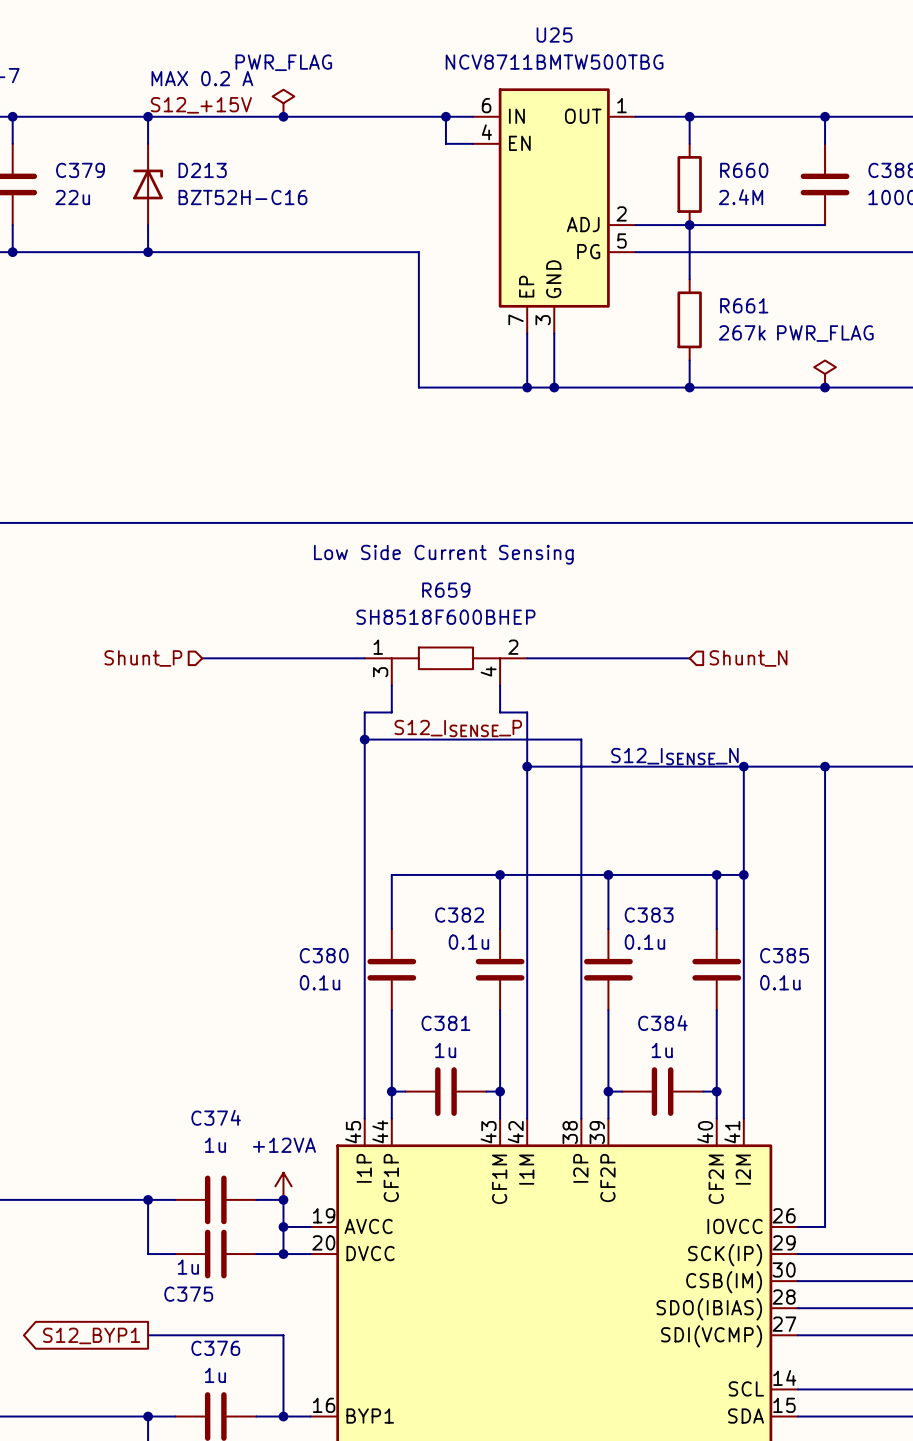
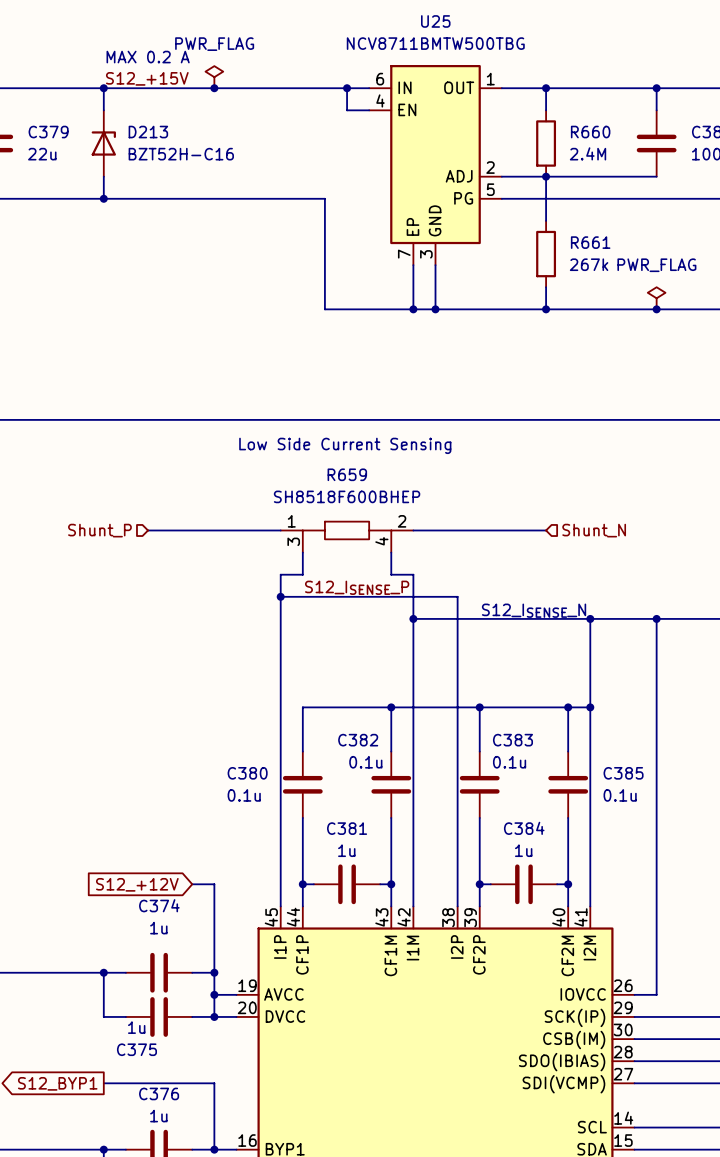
wire: none -> (192, 884) (214, 884) (214, 972)
global label: none -> S12_+12V (137, 884)
power symbol: +12VA (283, 1186) -> none

